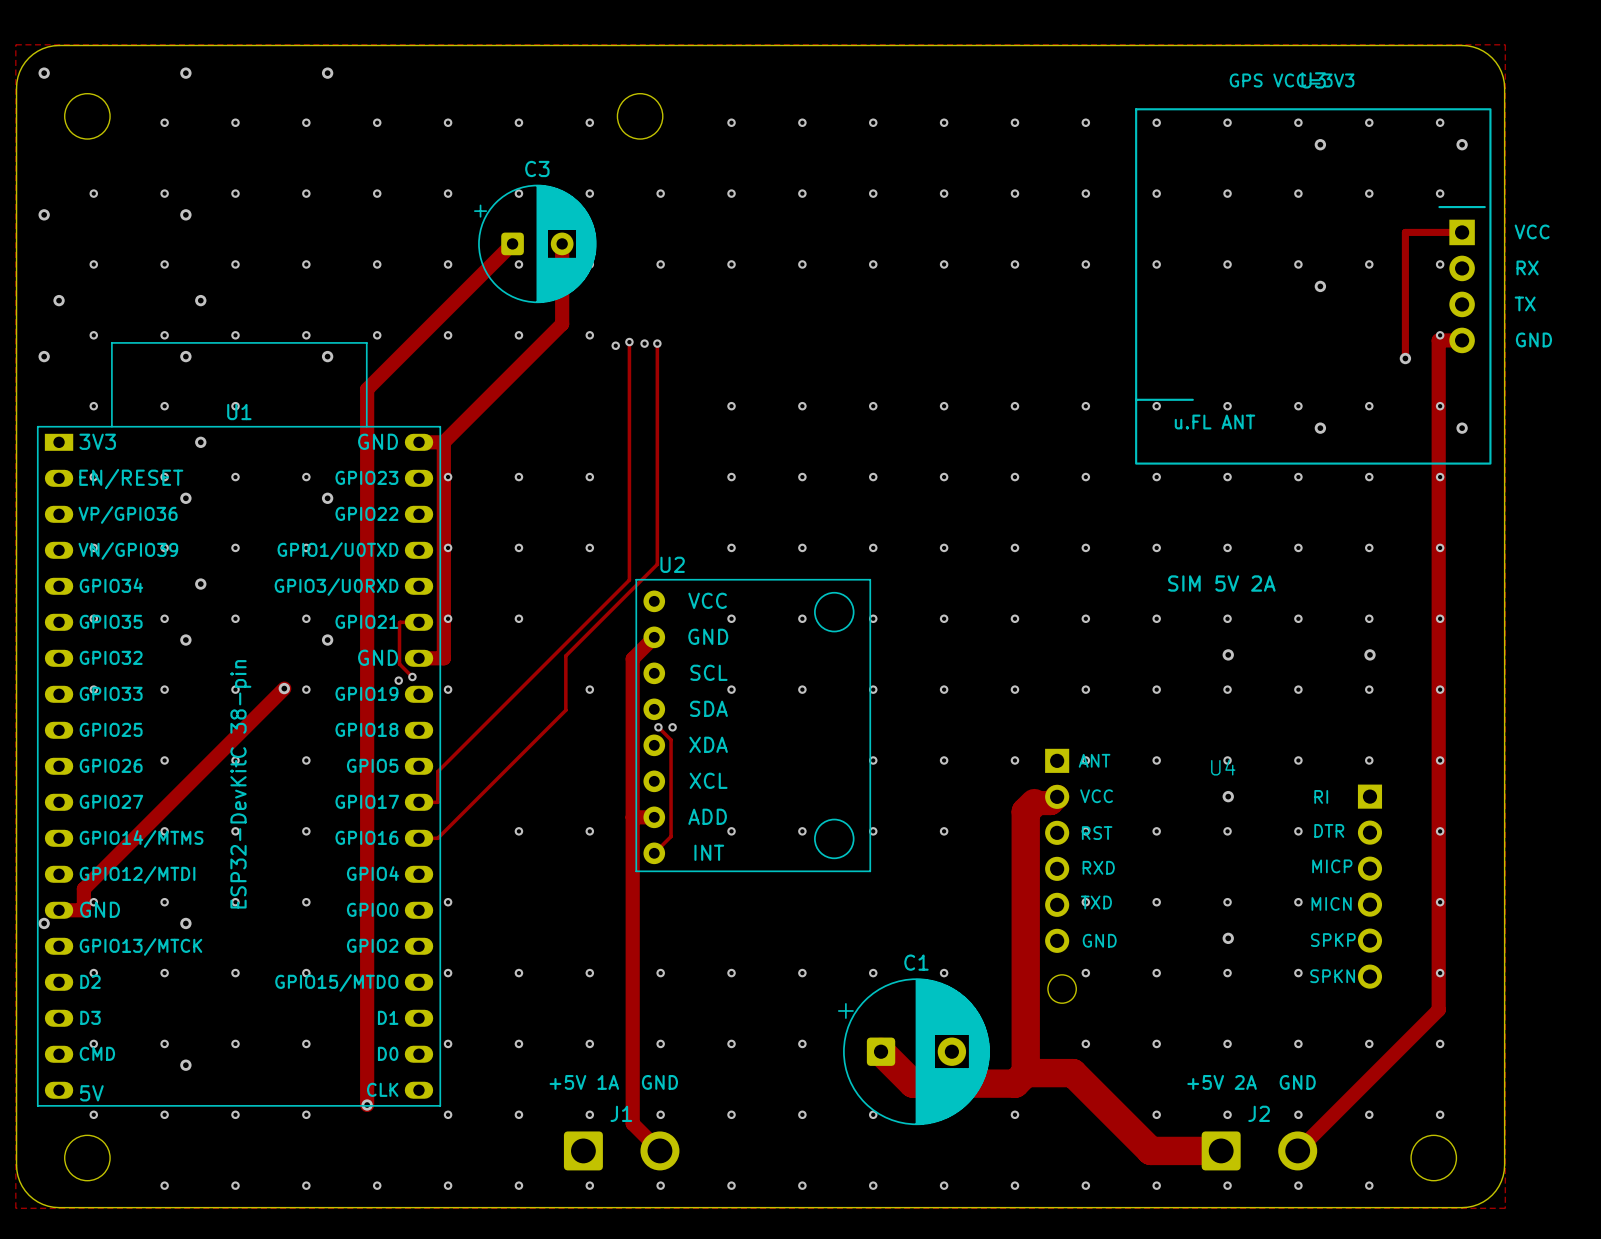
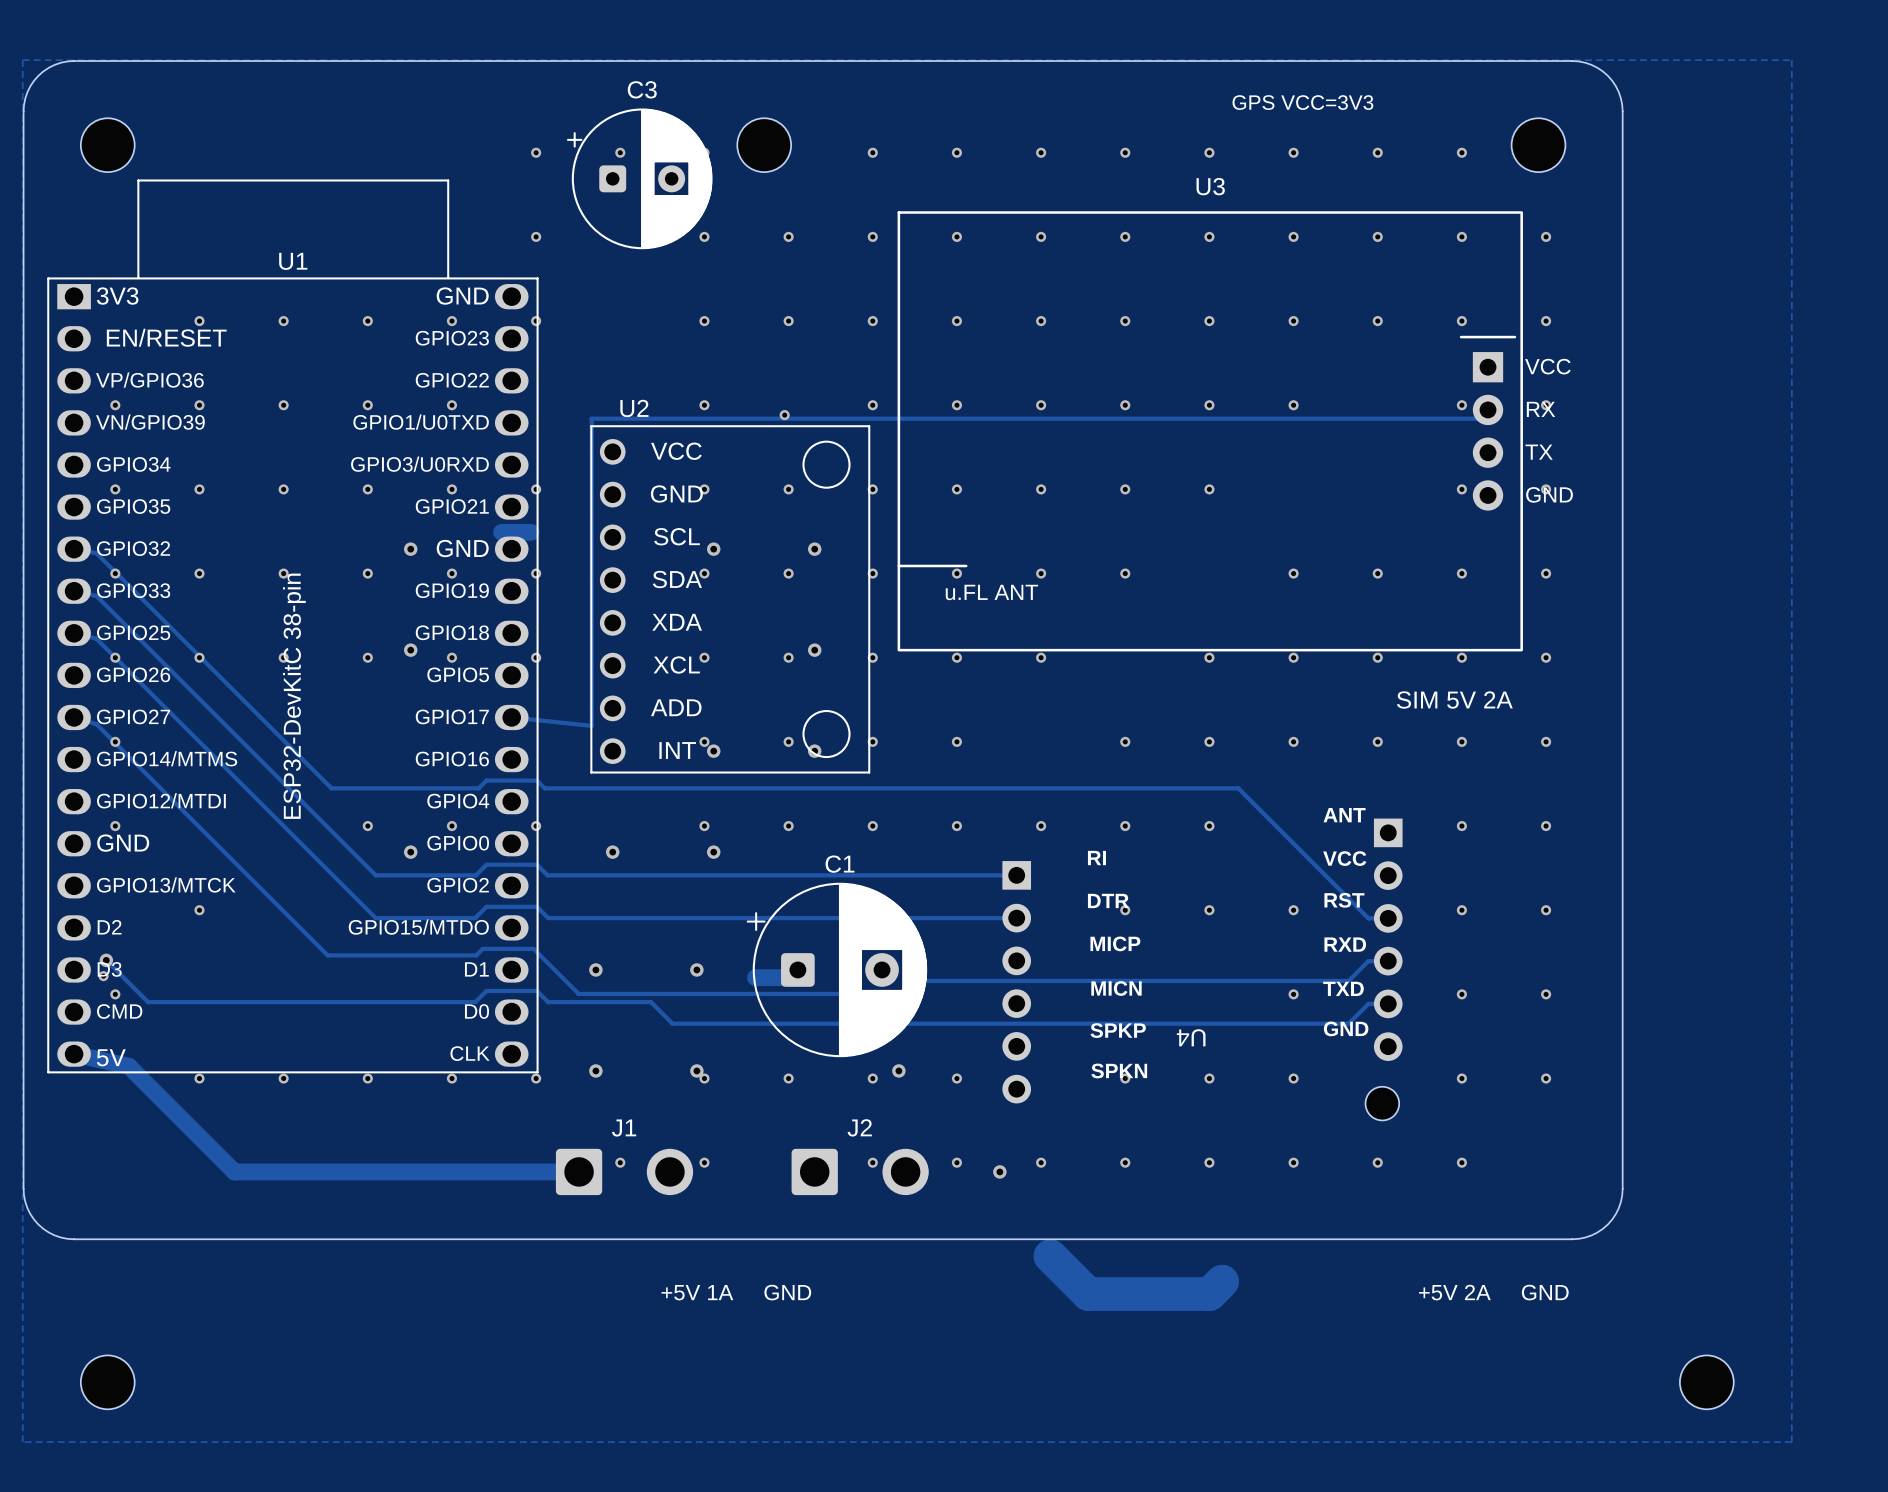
board edge: (1320, 45) (1473, 46) (1483, 51) (1495, 62) (1504, 82) (1504, 1165) (1498, 1186) (1487, 1198) (1478, 1204) (1462, 1207) (53, 1207) (42, 1204) (28, 1195) (22, 1186) (16, 1170) (16, 995) -> (1572, 61) (1591, 64) (1607, 75) (1618, 92) (1622, 111) (1622, 1188) (1620, 1201) (1615, 1214) (1602, 1228) (1585, 1237) (1572, 1239) (74, 1239) (54, 1235) (38, 1224) (27, 1208) (23, 1188)
via: (44, 73) -> none
via: (185, 73) -> none
via: (327, 73) -> none
text position: GPS VCC=3V3 (1292, 80) -> GPS VCC=3V3 (1302, 102)
U3 footprint: [1135, 108, 1492, 465] -> [897, 211, 1523, 652]
part: none -> (1538, 145)
via: (164, 122) -> none
via: (235, 122) -> none
via: (306, 122) -> none
via: (377, 122) -> none
via: (1298, 122) -> none
via: (1369, 122) -> none
via: (1440, 122) -> none
via: (1320, 144) -> none
via: (1462, 144) -> none
via: (93, 193) -> none
via: (164, 193) -> none
via: (235, 193) -> none
via: (306, 193) -> none
via: (377, 193) -> none
via: (518, 193) -> none
via: (1369, 193) -> none
via: (1440, 193) -> none
via: (44, 214) -> none
via: (185, 214) -> none
track: (1462, 232) (1405, 232) (1405, 358) -> none
track: (512, 243) (367, 389) (367, 1105) -> none
C3 position: (535, 243) -> (639, 178)
track: (562, 243) (562, 324) (443, 442) (443, 658) (419, 658) -> none
via: (93, 264) -> none
via: (518, 264) -> none
via: (1369, 264) -> none
via: (1440, 264) -> none
via: (1320, 286) -> none
via: (59, 300) -> none
via: (200, 300) -> none
via: (448, 335) -> none
via: (518, 335) -> none
via: none -> (872, 405)
via: none -> (956, 405)
via: none -> (1041, 405)
via: none -> (1125, 405)
via: none -> (1209, 405)
via: none -> (1293, 405)
via: none -> (1461, 405)
via: none -> (1546, 405)
via: (1440, 335) -> none
track: none -> (1488, 409) (1488, 418) (591, 418) (591, 725) (511, 717)
track: (1462, 340) (1438, 340) (1438, 1009) (1297, 1150) -> none
U1 footprint: [36, 342, 442, 1107] -> [47, 179, 539, 1074]
track: (629, 342) (629, 580) (437, 771) (437, 802) (419, 802) -> none
via: (629, 342) -> none
via: (644, 343) -> none
track: (657, 343) (657, 564) (565, 655) (565, 710) (437, 838) (419, 838) -> none
via: (615, 345) -> none
via: (44, 356) -> none
via: (185, 356) -> none
via: (327, 356) -> none
via: (1405, 358) -> none
via: none -> (367, 489)
via: none -> (451, 489)
via: none -> (536, 489)
via: none -> (704, 489)
via: none -> (788, 489)
via: (1085, 406) -> none
via: (1156, 406) -> none
via: (1369, 406) -> none
via: (1440, 406) -> none
via: (1320, 428) -> none
via: (1462, 428) -> none
via: (200, 442) -> none
track: none -> (74, 549) (96, 553) (331, 788) (478, 788) (486, 780) (536, 780) (544, 788) (1238, 788) (1368, 918) (1388, 918)
via: none -> (410, 549)
via: none -> (713, 549)
via: none -> (814, 549)
via: none -> (451, 573)
via: (518, 477) -> none
via: none -> (788, 573)
via: (1014, 477) -> none
via: (1369, 477) -> none
via: (1440, 477) -> none
track: none -> (74, 591) (96, 595) (375, 875) (475, 875) (486, 864) (536, 864) (547, 875) (1016, 875)
via: (185, 498) -> none
via: (327, 498) -> none
track: none -> (74, 633) (96, 638) (375, 918) (475, 918) (486, 906) (536, 906) (548, 918) (1016, 918)
via: none -> (410, 650)
via: none -> (814, 650)
via: none -> (451, 657)
via: (518, 547) -> none
via: none -> (788, 657)
via: (944, 547) -> none
via: (1369, 547) -> none
via: (1440, 547) -> none
U2 footprint: [635, 578, 872, 873] -> [590, 425, 871, 774]
via: (200, 584) -> none
track: none -> (74, 717) (96, 724) (327, 955) (476, 955) (482, 948) (533, 948) (578, 993) (899, 993) (912, 980) (1348, 980) (1368, 961) (1388, 961)
via: (164, 618) -> none
via: (235, 618) -> none
via: (306, 618) -> none
via: (448, 618) -> none
via: (518, 618) -> none
via: none -> (704, 741)
via: none -> (788, 741)
via: (873, 618) -> none
via: (1369, 618) -> none
via: (1440, 618) -> none
track: (419, 622) (399, 623) (399, 664) (412, 676) -> none
via: none -> (713, 751)
via: none -> (814, 751)
track: (654, 637) (632, 658) (632, 1123) (659, 1150) -> none
via: (185, 640) -> none
via: (327, 640) -> none
via: (1228, 654) -> none
via: (1369, 654) -> none
via: (412, 676) -> none
via: (398, 680) -> none
track: (284, 688) (83, 889) (83, 910) (59, 910) -> none
via: (284, 688) -> none
via: (164, 689) -> none
via: (235, 689) -> none
via: none -> (451, 826)
via: none -> (788, 826)
via: (1085, 689) -> none
via: (1156, 689) -> none
via: (1369, 689) -> none
via: (1440, 689) -> none
via: none -> (410, 852)
via: none -> (612, 852)
via: none -> (713, 852)
track: (658, 727) (671, 739) (671, 836) (654, 853) -> none
via: (658, 727) -> none
via: (672, 727) -> none
U4 footprint: [1045, 748, 1383, 1004] -> [1002, 818, 1403, 1121]
via: (235, 760) -> none
via: (306, 760) -> none
via: (873, 760) -> none
via: (1156, 760) -> none
via: (1369, 760) -> none
via: (1440, 760) -> none
U4 name position: U4 (1223, 767) -> U4 (1191, 1037)
track: (1057, 796) (1050, 803) (1034, 803) (1025, 811) (1025, 1073) (1072, 1073) (1150, 1150) (1221, 1150) -> none
via: (1228, 796) -> none
track: none -> (106, 960) (148, 1002)
via: none -> (106, 960)
via: none -> (595, 969)
via: none -> (696, 969)
via: none -> (103, 976)
via: none -> (115, 994)
via: (164, 831) -> none
via: (235, 831) -> none
via: (306, 831) -> none
via: (518, 831) -> none
via: (589, 831) -> none
via: (731, 831) -> none
via: (802, 831) -> none
via: (873, 831) -> none
via: (944, 831) -> none
via: (1156, 831) -> none
via: (1440, 831) -> none
track: none -> (148, 1002) (475, 1002) (486, 991) (536, 991) (548, 1002) (651, 1002)
track: none -> (651, 1002) (672, 1023) (1348, 1023) (1368, 1003) (1388, 1003)
track: none -> (74, 1054) (128, 1066) (234, 1171) (579, 1171)
via: none -> (595, 1070)
via: none -> (696, 1070)
via: none -> (898, 1070)
via: (93, 902) -> none
via: none -> (451, 1078)
via: none -> (704, 1078)
via: none -> (788, 1078)
via: none -> (872, 1078)
via: none -> (956, 1078)
via: none -> (1125, 1078)
via: none -> (1209, 1078)
via: (1156, 902) -> none
via: (1440, 902) -> none
via: (44, 923) -> none
via: (185, 923) -> none
via: (1228, 938) -> none
via: (93, 973) -> none
via: (164, 973) -> none
via: (235, 973) -> none
via: (306, 973) -> none
via: (448, 973) -> none
via: (660, 973) -> none
via: none -> (1209, 1162)
via: (1298, 973) -> none
via: (1440, 973) -> none
via: none -> (999, 1171)
via: (93, 1043) -> none
via: (164, 1043) -> none
via: (235, 1043) -> none
via: (306, 1043) -> none
via: (448, 1043) -> none
via: (518, 1043) -> none
via: (589, 1043) -> none
via: (660, 1043) -> none
via: (731, 1043) -> none
via: (802, 1043) -> none
via: (1085, 1043) -> none
via: (1156, 1043) -> none
via: (1227, 1043) -> none
via: (1298, 1043) -> none
via: (1369, 1043) -> none
via: (1440, 1043) -> none
C1 position: (913, 1051) -> (836, 969)
via: (185, 1065) -> none
via: (367, 1105) -> none
via: (93, 1114) -> none
via: (164, 1114) -> none
via: (235, 1114) -> none
via: (306, 1114) -> none
via: (448, 1114) -> none
via: (518, 1114) -> none
via: (589, 1114) -> none
via: (660, 1114) -> none
via: (731, 1114) -> none
via: (802, 1114) -> none
via: (873, 1114) -> none
via: (1014, 1114) -> none
via: (1156, 1114) -> none
via: (1227, 1114) -> none
via: (1298, 1114) -> none
via: (1369, 1114) -> none
via: (1440, 1114) -> none
J1 position: (621, 1150) -> (624, 1171)
J2 position: (1259, 1150) -> (860, 1171)
via: (164, 1185) -> none
via: (235, 1185) -> none
via: (306, 1185) -> none
via: (377, 1185) -> none
via: (448, 1185) -> none
via: (518, 1185) -> none
via: (589, 1185) -> none
via: (660, 1185) -> none
via: (731, 1185) -> none
via: (802, 1185) -> none
via: (873, 1185) -> none
via: (944, 1185) -> none
via: (1014, 1185) -> none
via: (1085, 1185) -> none
via: (1156, 1185) -> none
via: (1227, 1185) -> none
via: (1298, 1185) -> none
via: (1369, 1185) -> none

